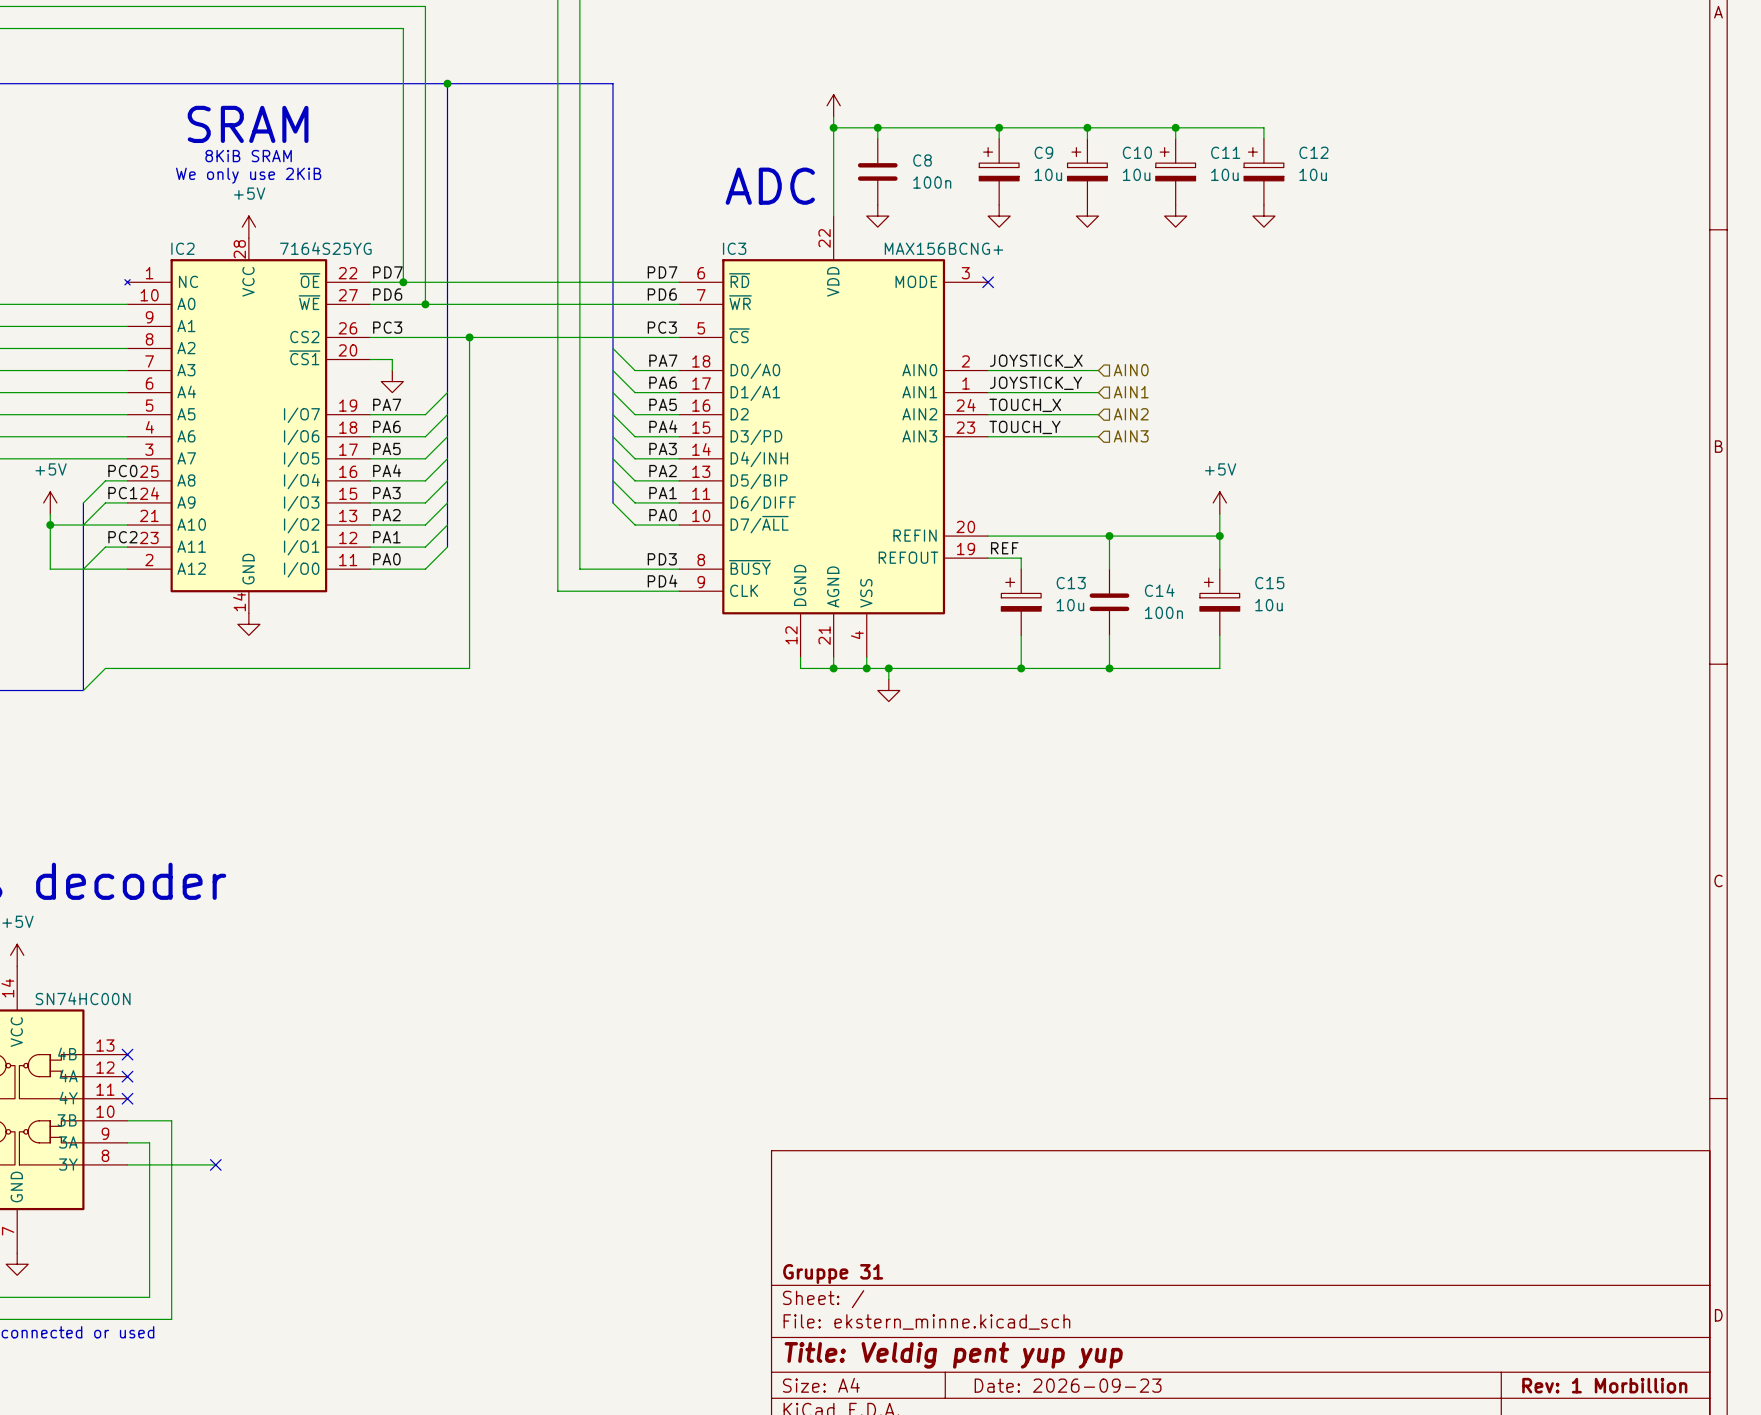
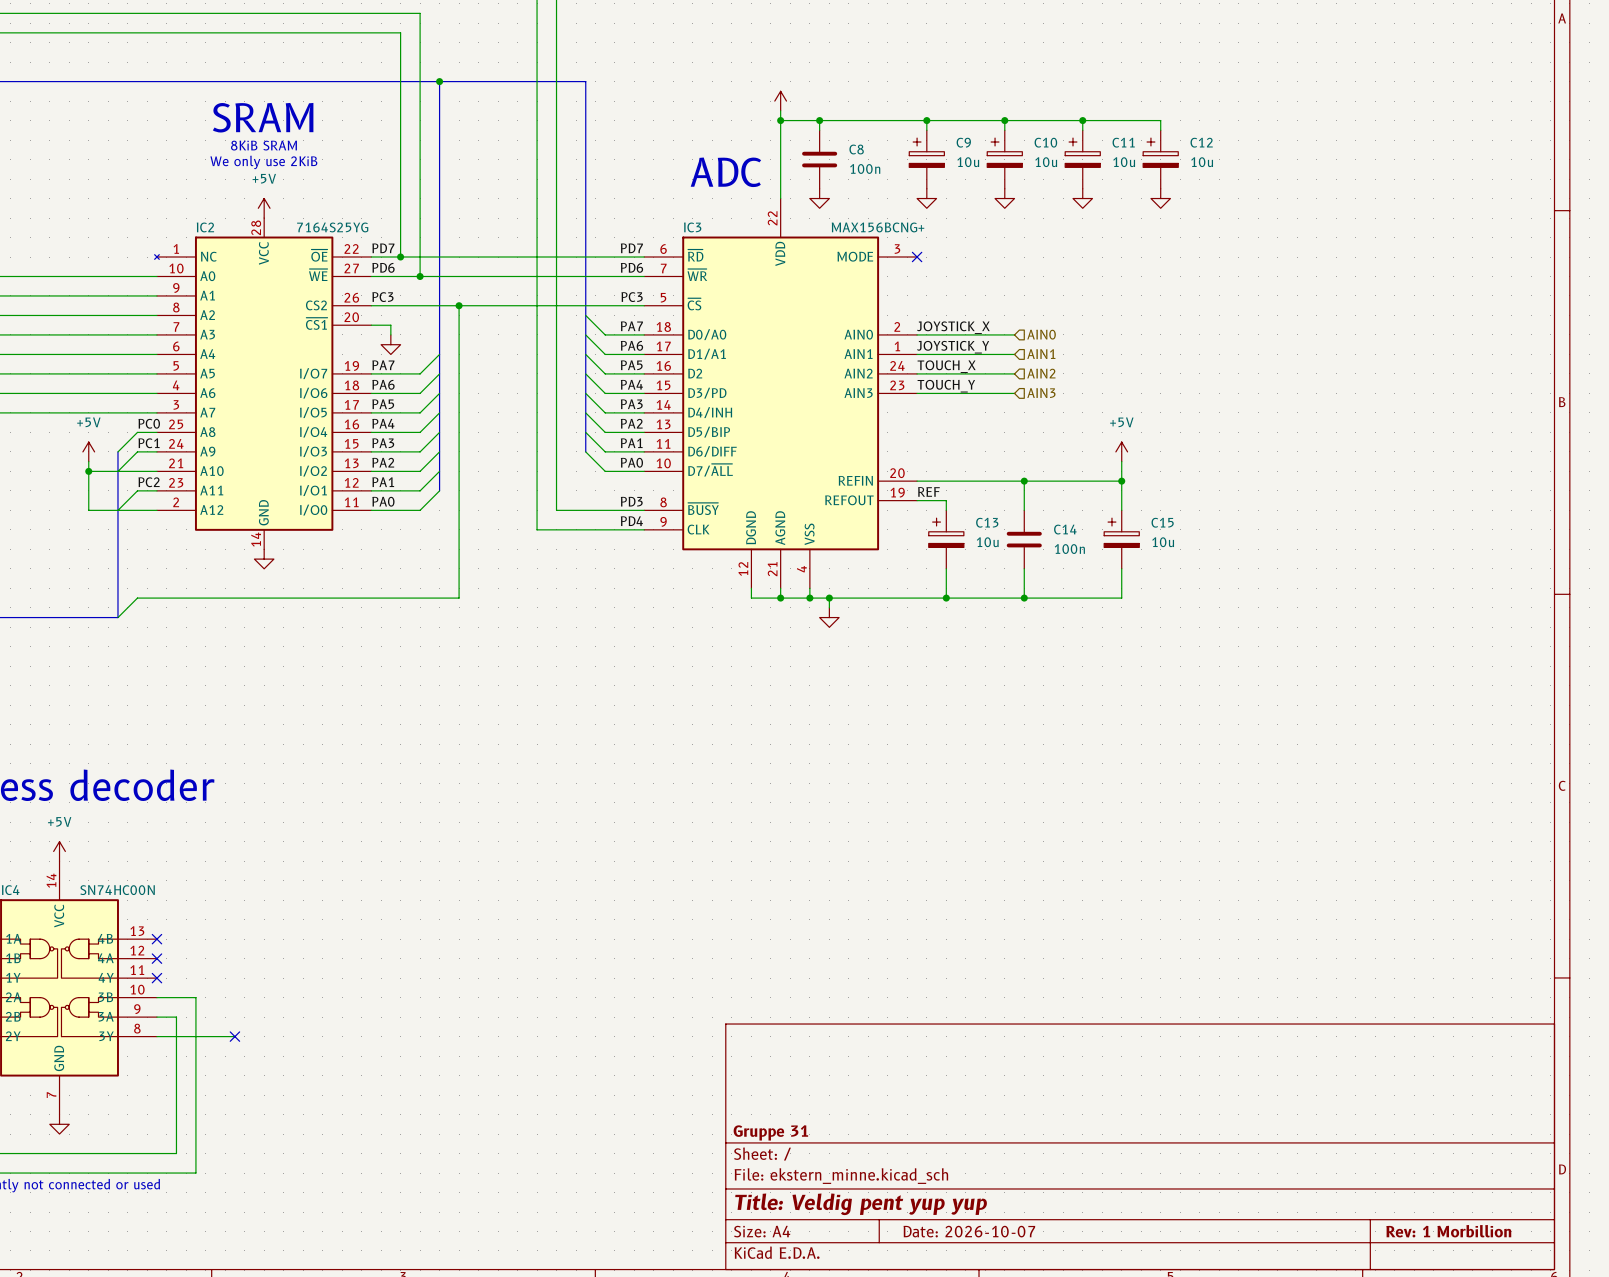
title block: Date: 2026-09-23 (1068, 1385) -> Date: 2026-10-07 (969, 1231)

